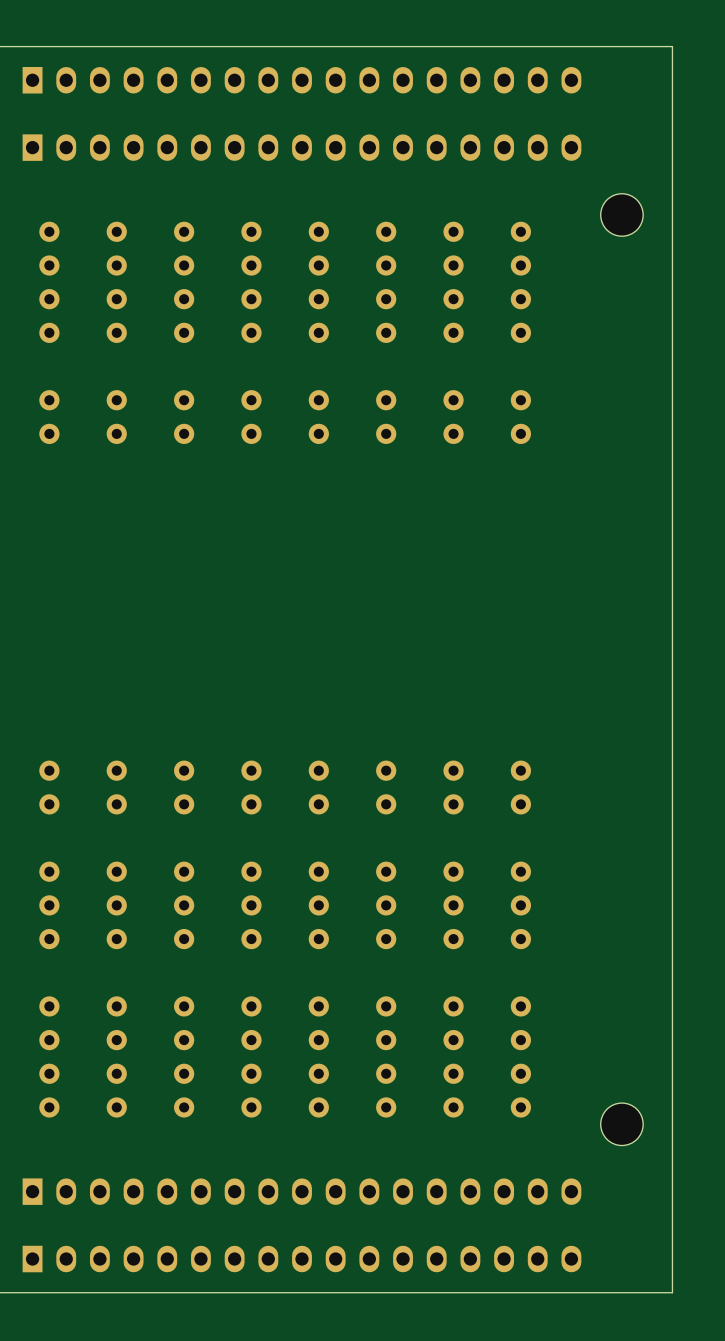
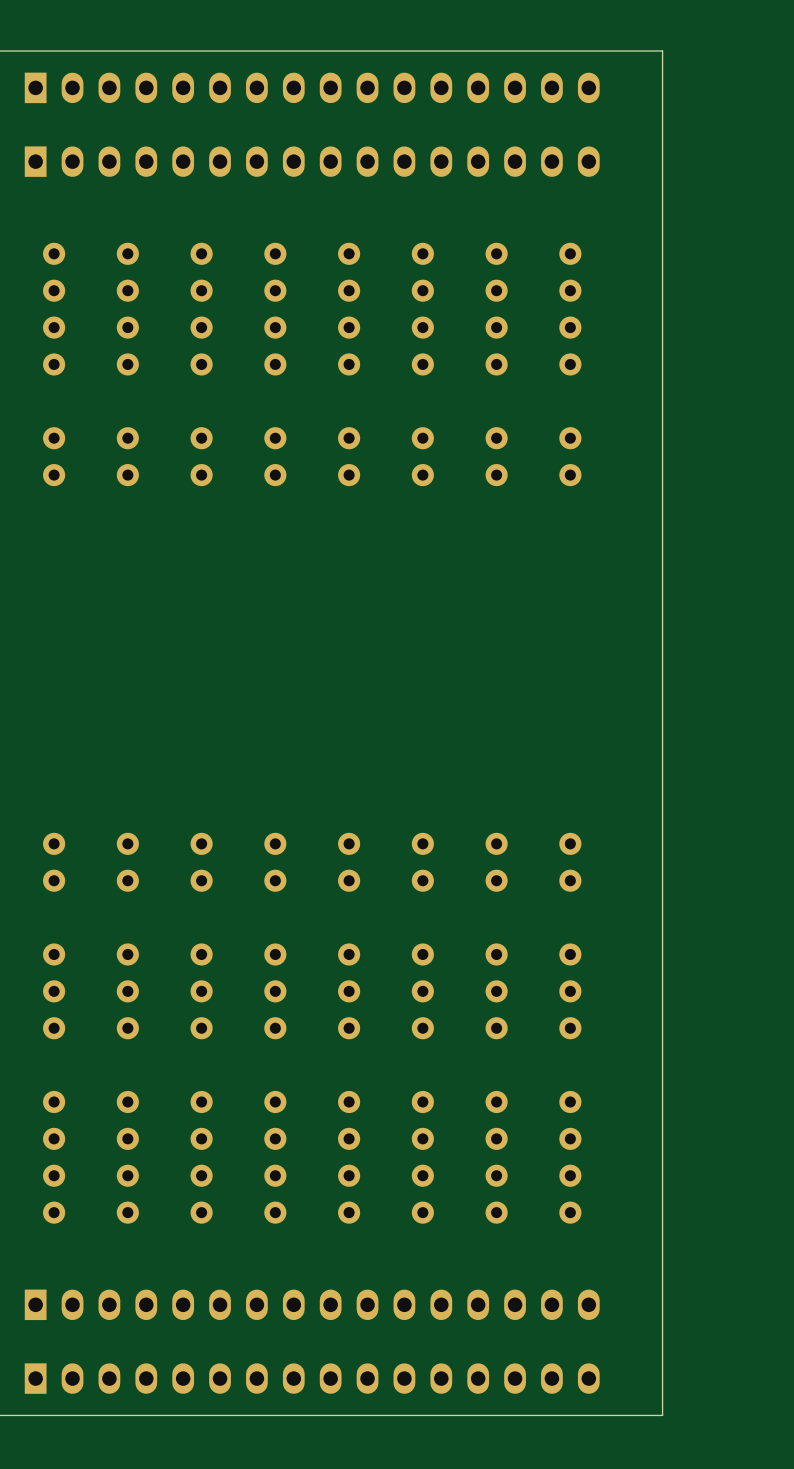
board edge: (605, 46) (672, 46) (672, 1292) (605, 1292) -> (662, 51) (662, 1415)
part: none -> (312, 87)
part: (301, 80) -> none
part: none -> (312, 161)
part: (301, 147) -> none
part: (621, 214) -> none
part: (621, 1124) -> none
part: none -> (312, 1304)
part: (301, 1191) -> none
part: none -> (312, 1378)
part: (301, 1259) -> none

